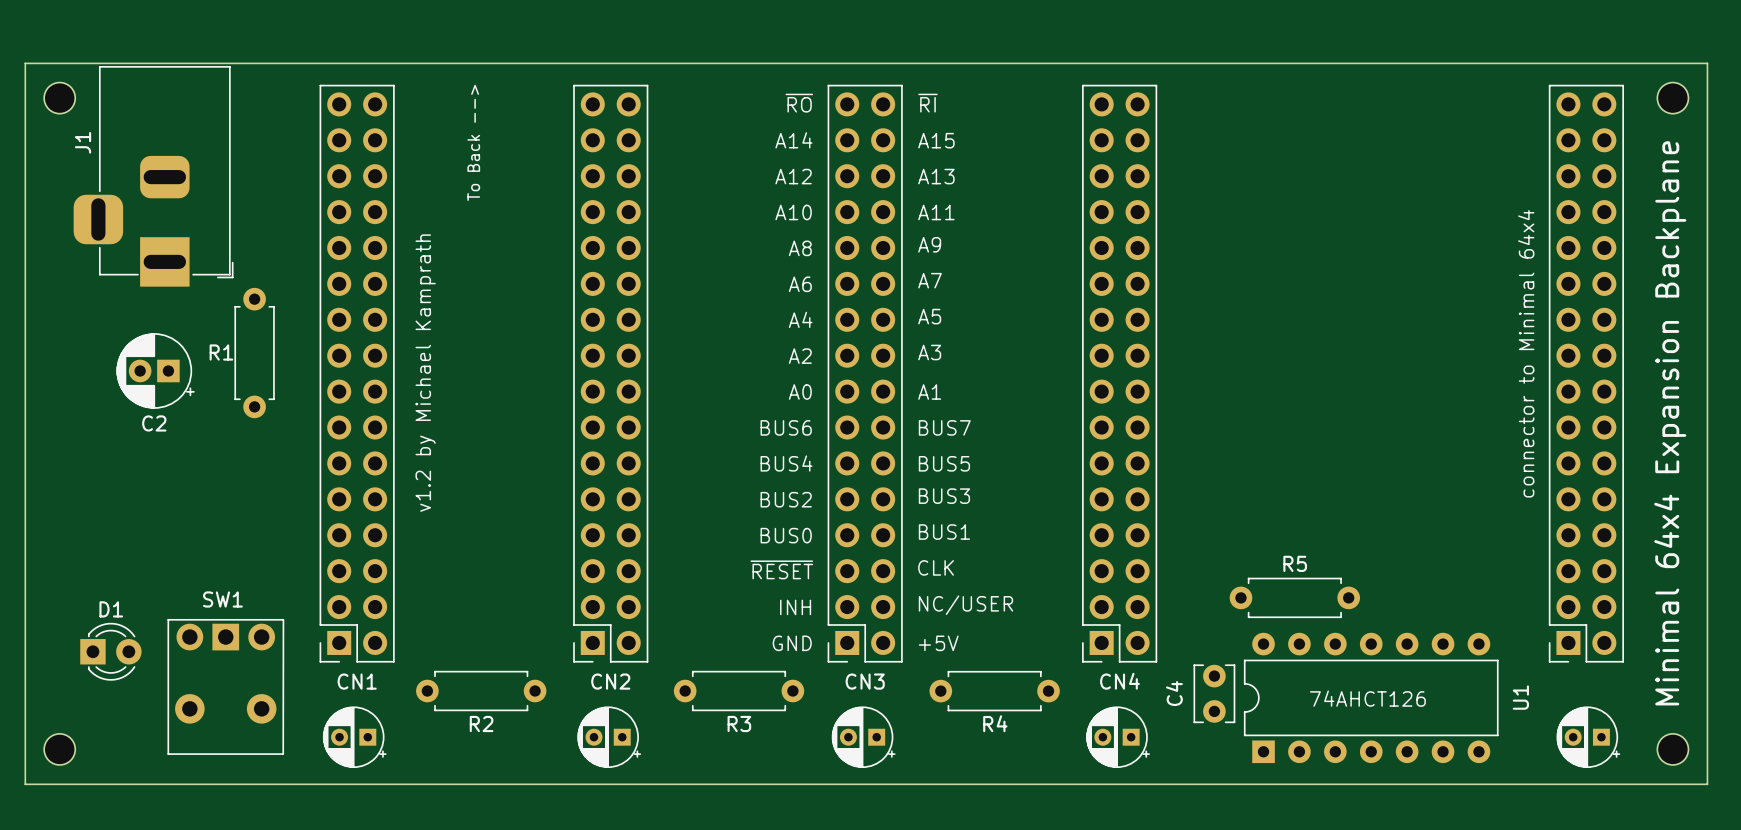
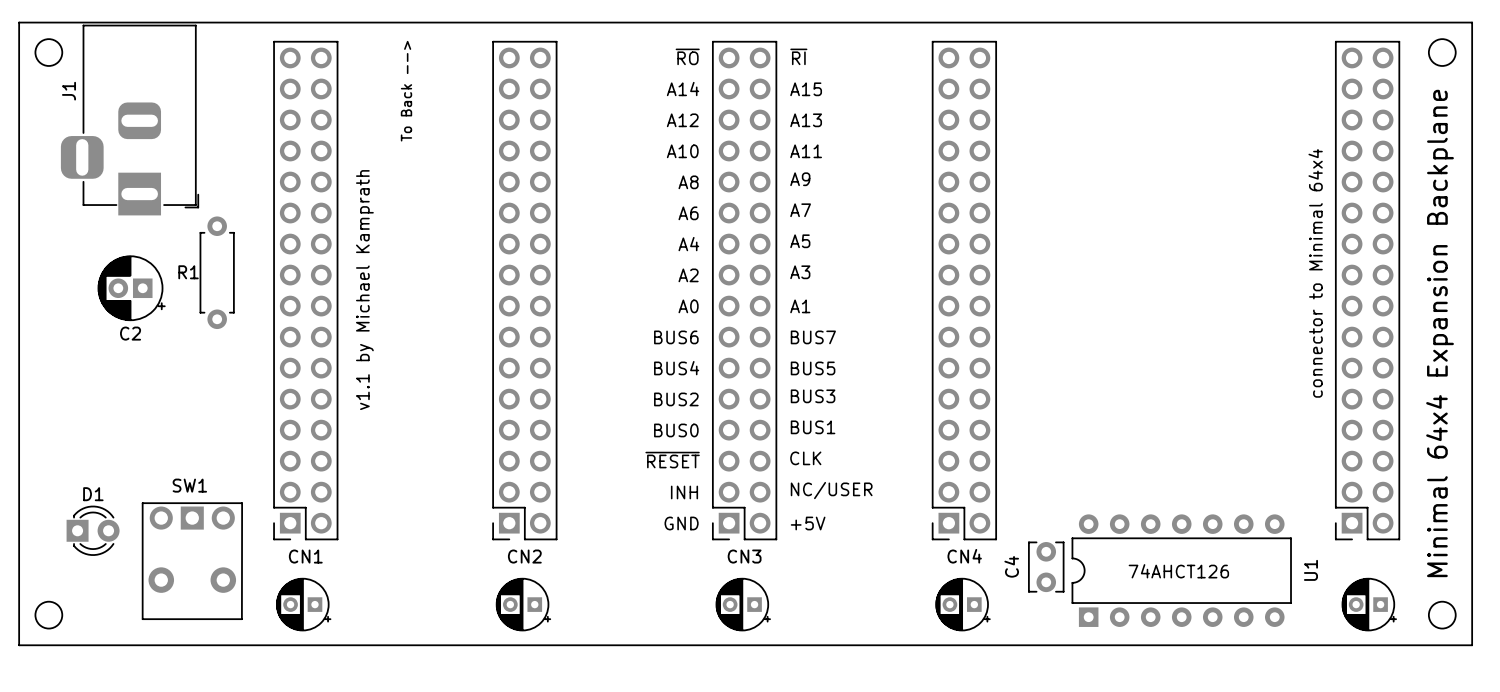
text: v1.2 by Michael Kamprath (425, 373) -> v1.1 by Michael Kamprath (364, 290)
R5: (1294, 597) -> none
R2: (481, 691) -> none
R3: (739, 691) -> none
R4: (994, 691) -> none

